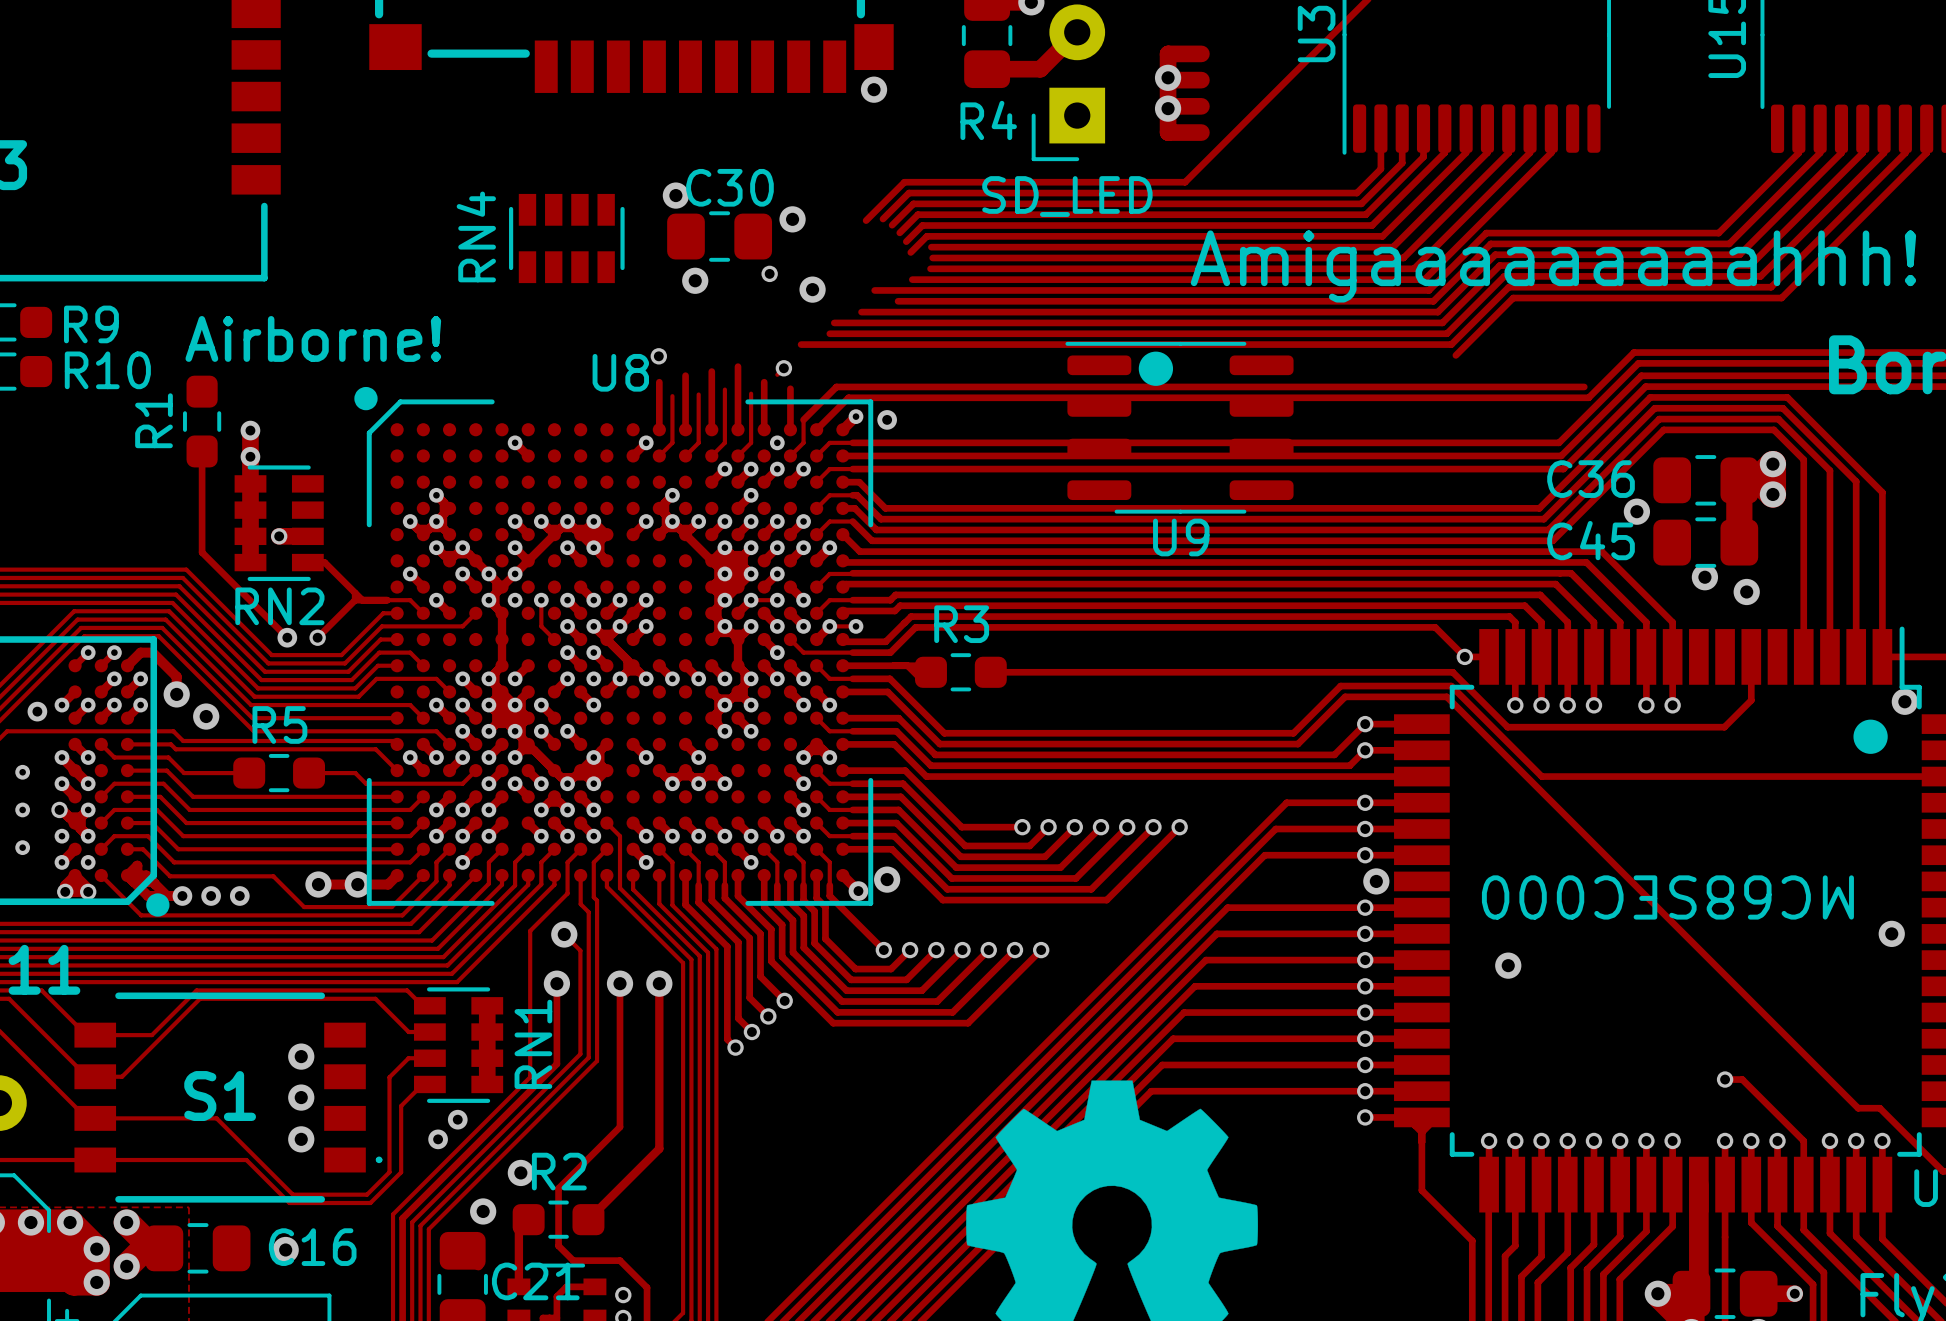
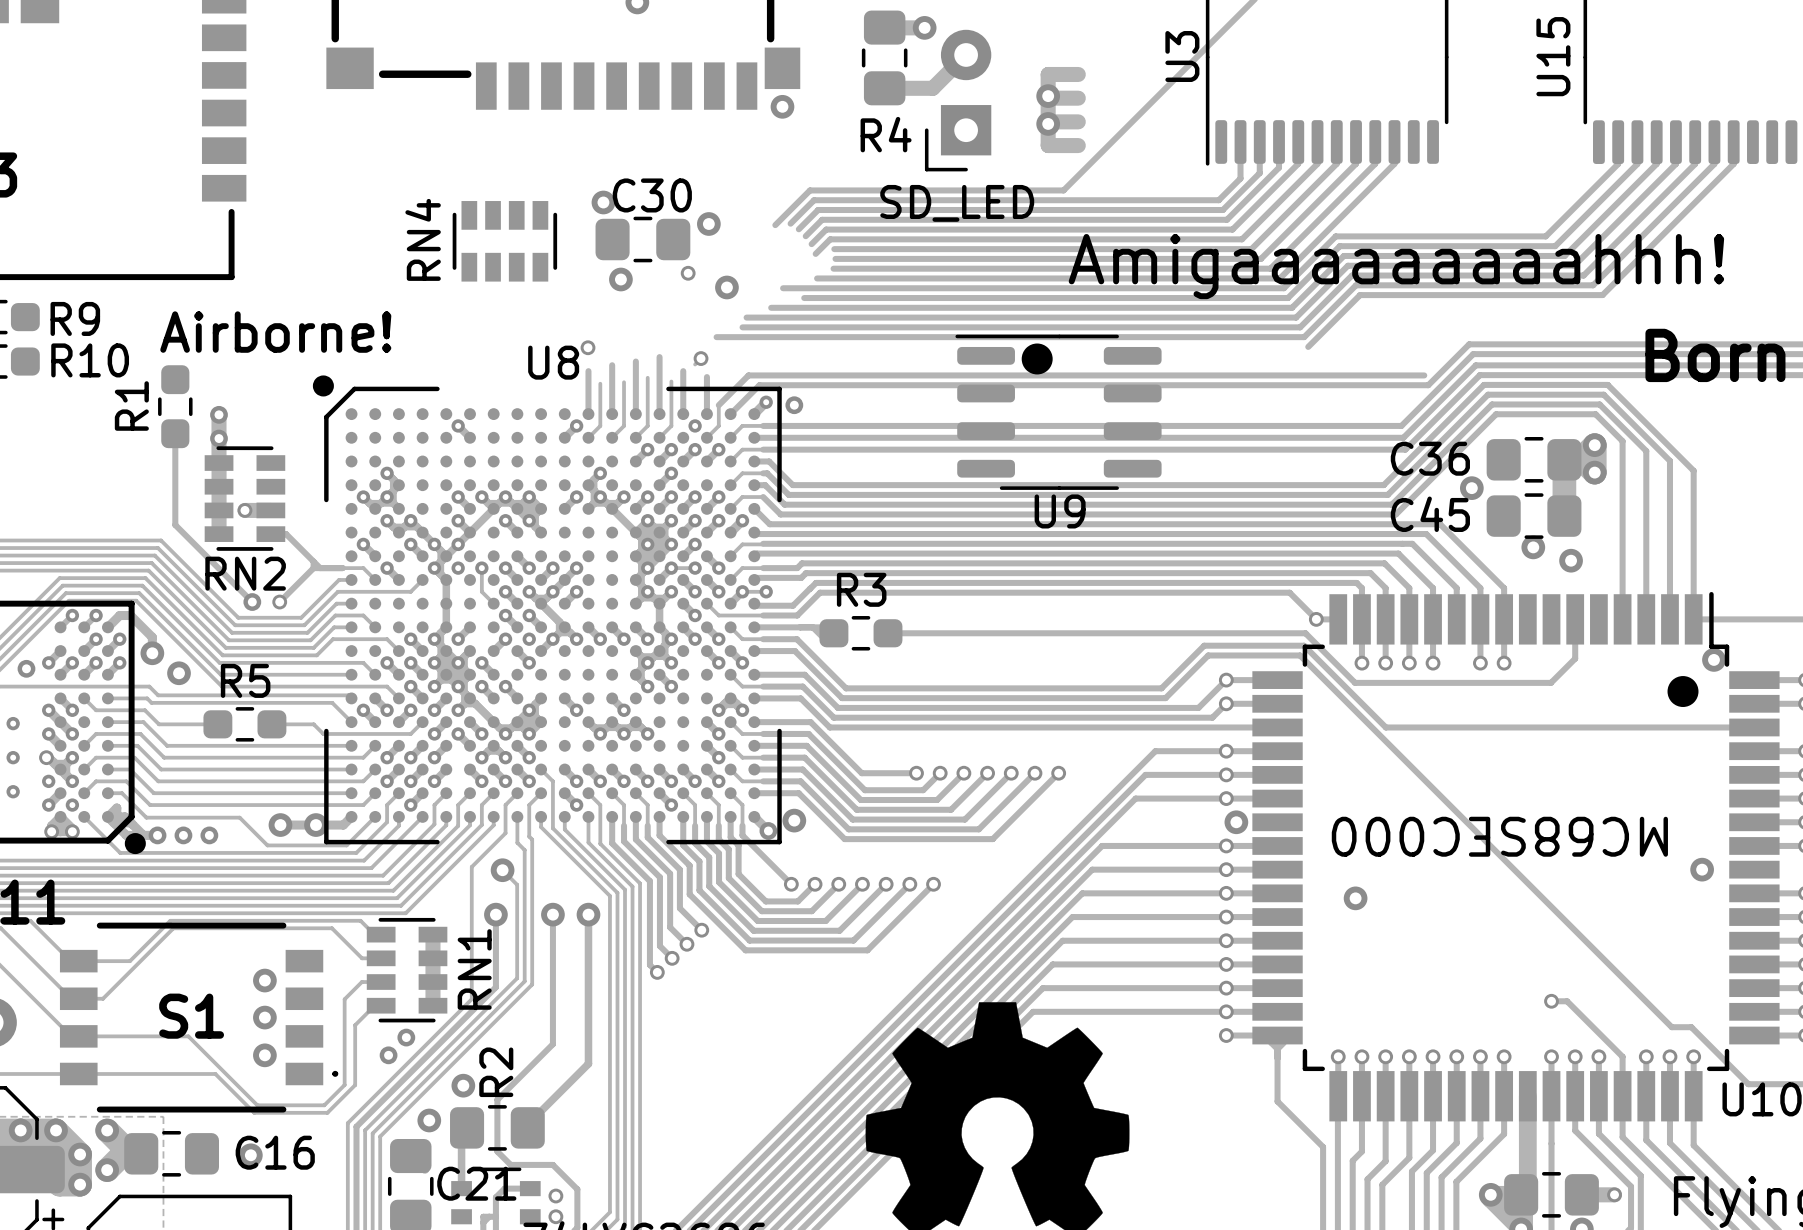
R2 name rotation: 0° (559, 1171) -> 90° counterclockwise (496, 1072)
R2 footprint: [512, 1200, 605, 1239] -> [450, 1105, 545, 1151]

